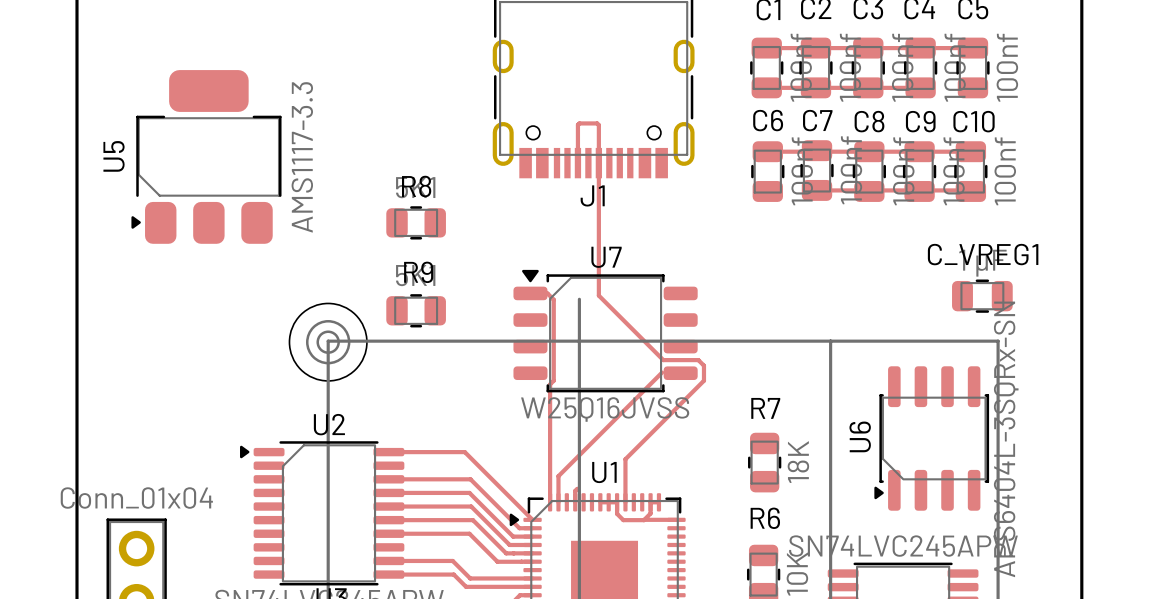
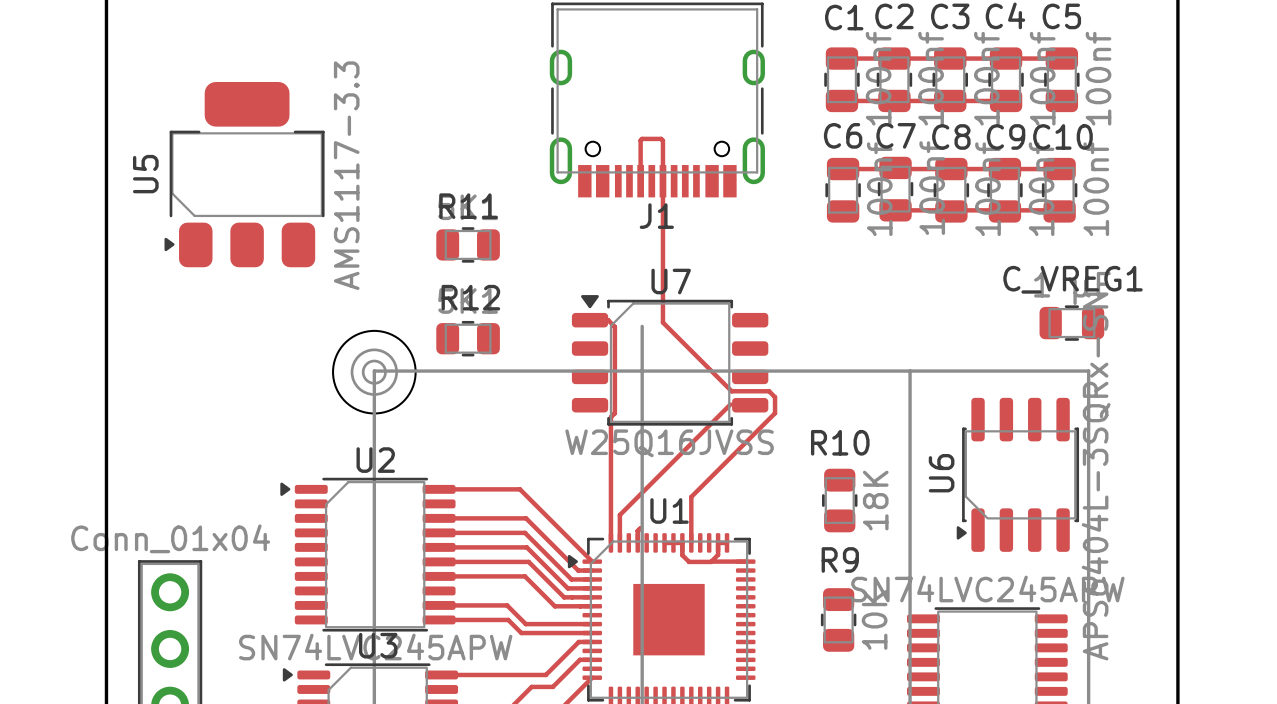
R8 name: R8 (416, 186) -> R11 (468, 206)
R9 name: R9 (418, 272) -> R12 (470, 297)
R7 name: R7 (765, 408) -> R10 (840, 442)
R6 name: R6 (765, 518) -> R9 (840, 559)

